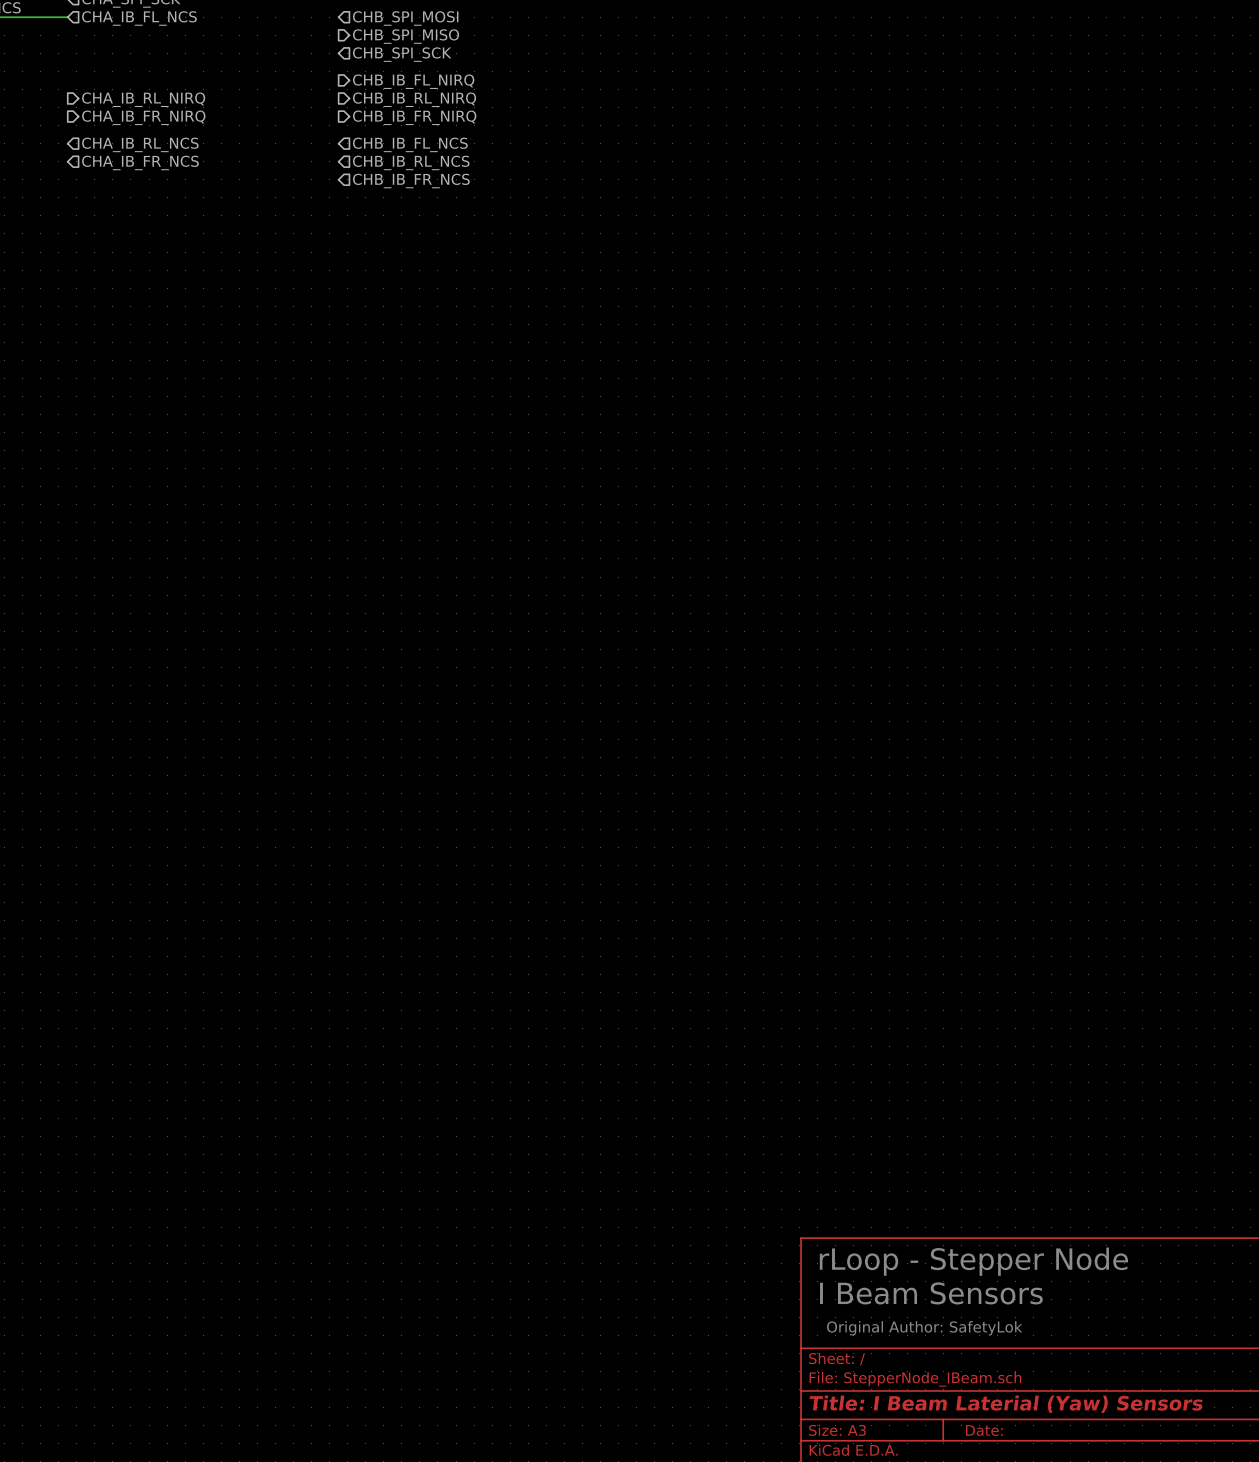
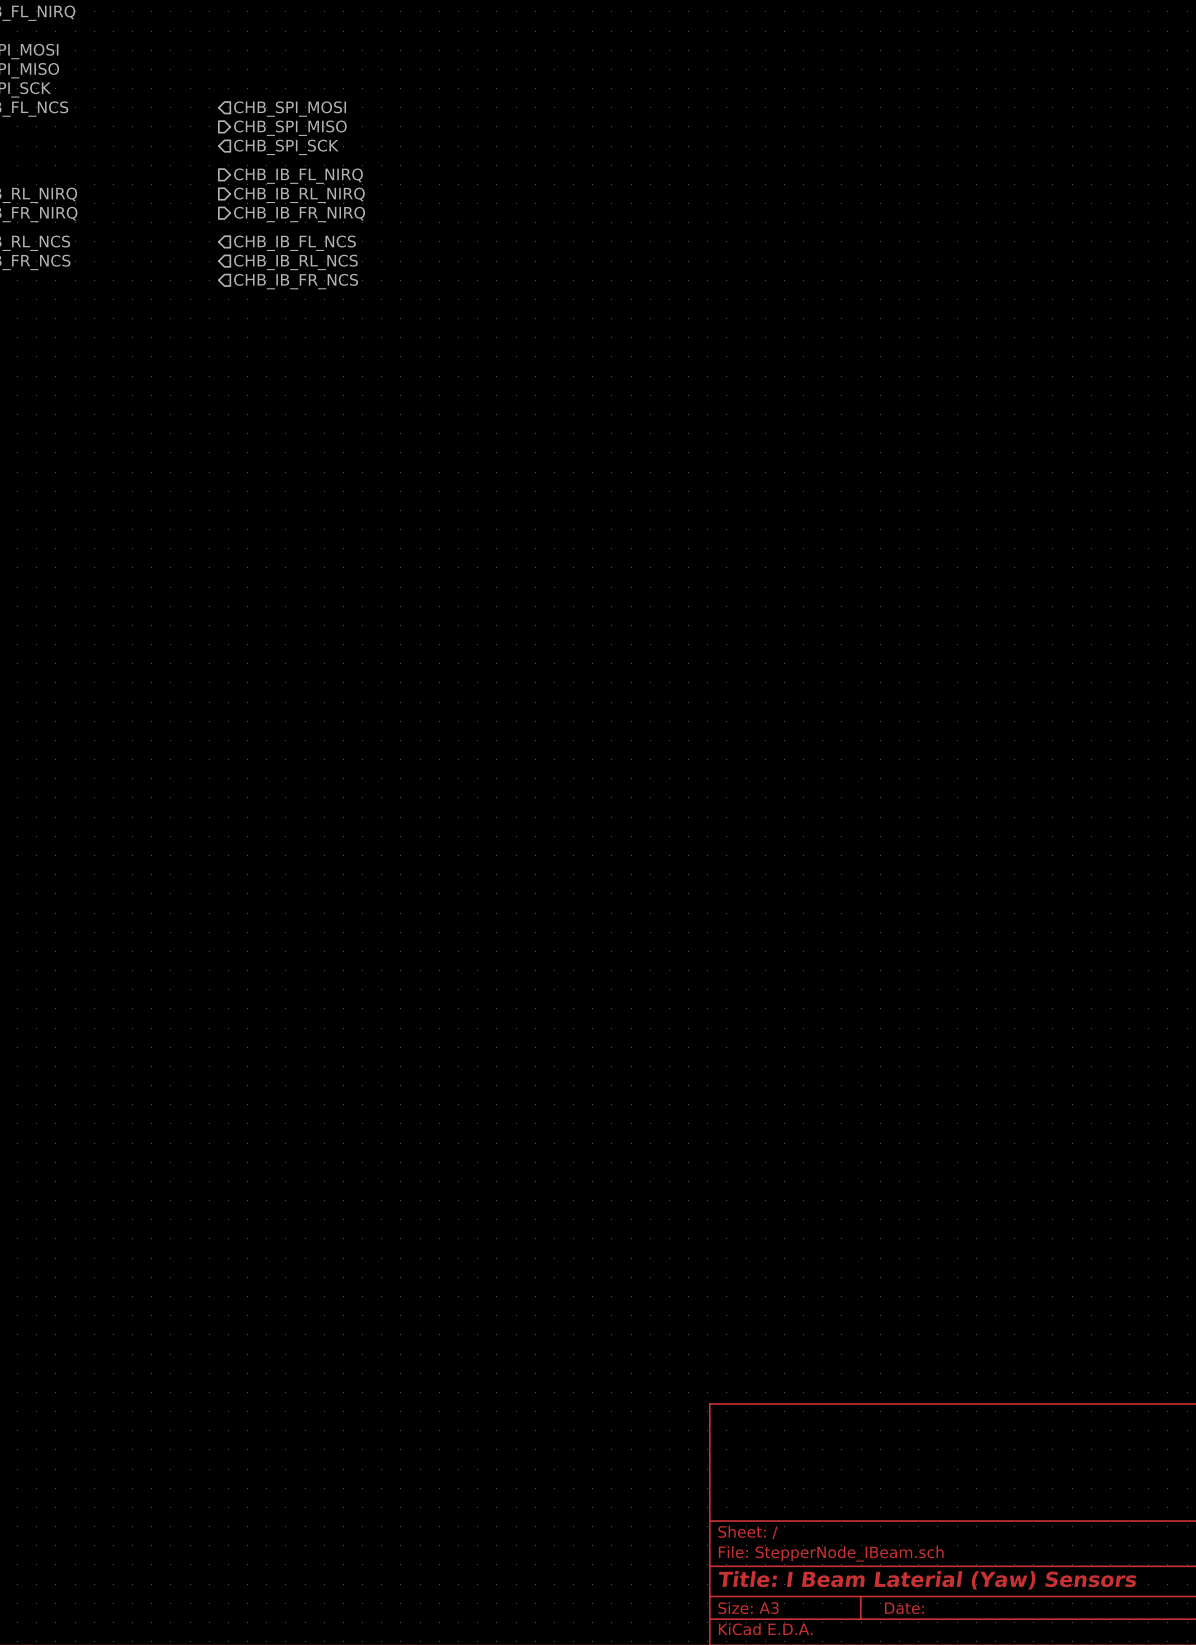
text: rLoop - Stepper Node (973, 1261) -> none
text: I Beam Sensors (931, 1293) -> none
text: Original Author: SafetyLok (924, 1328) -> none

